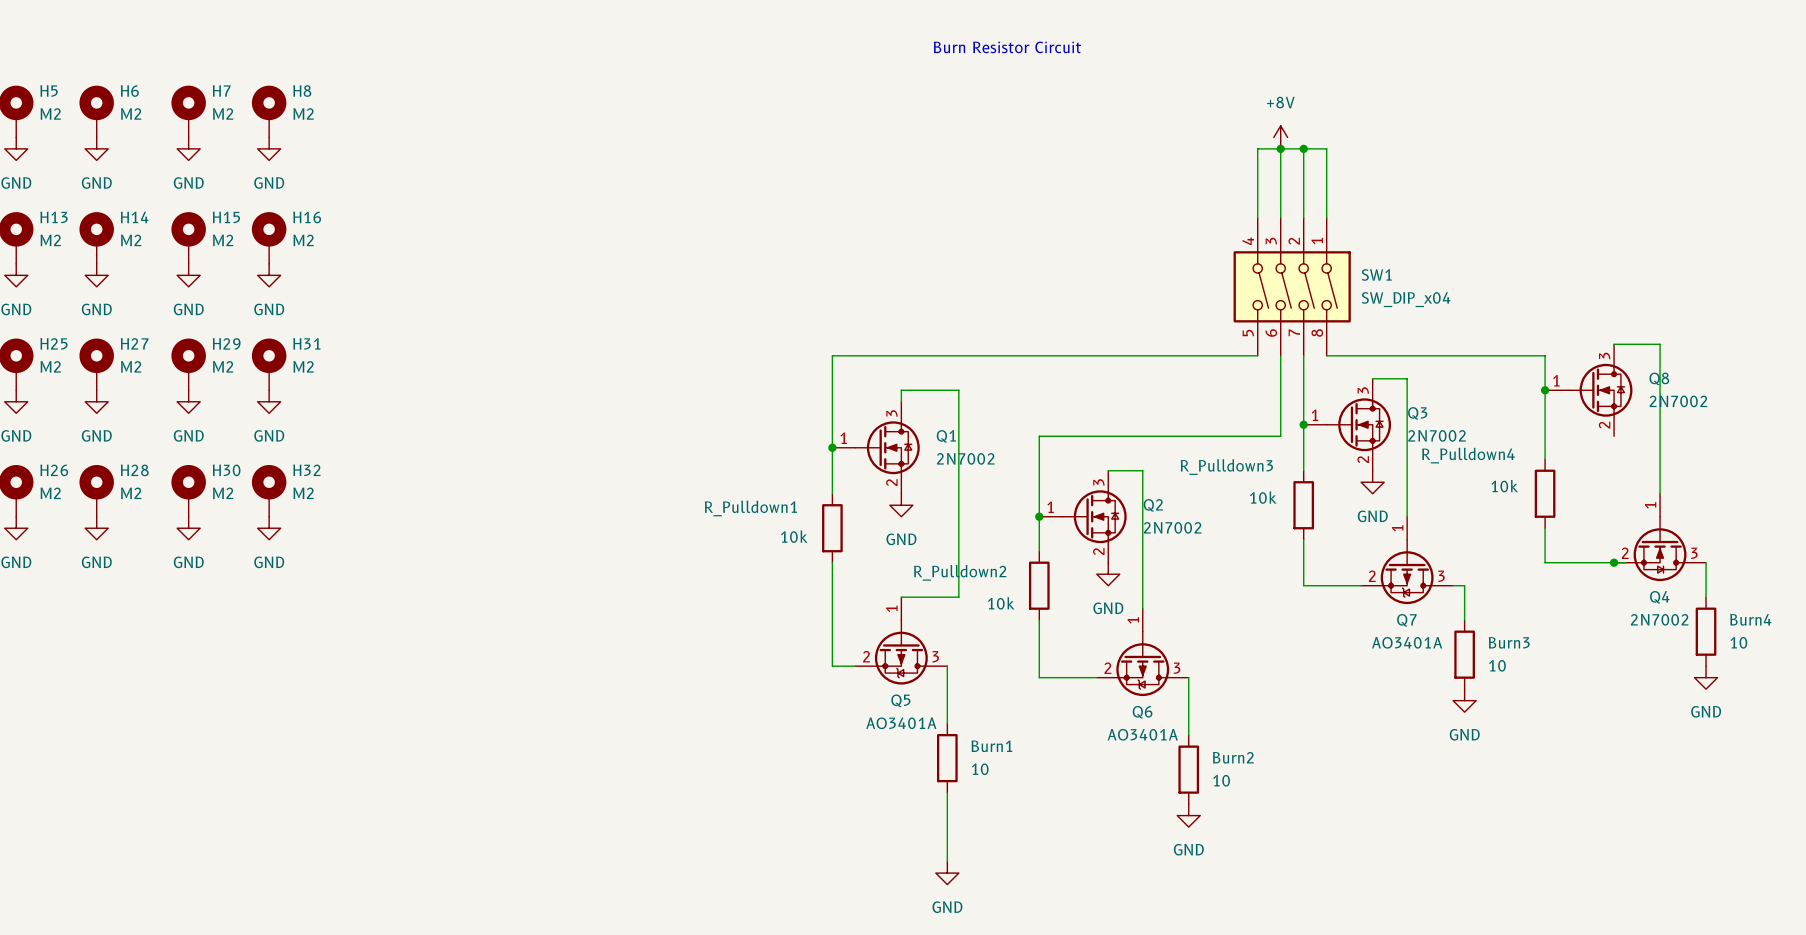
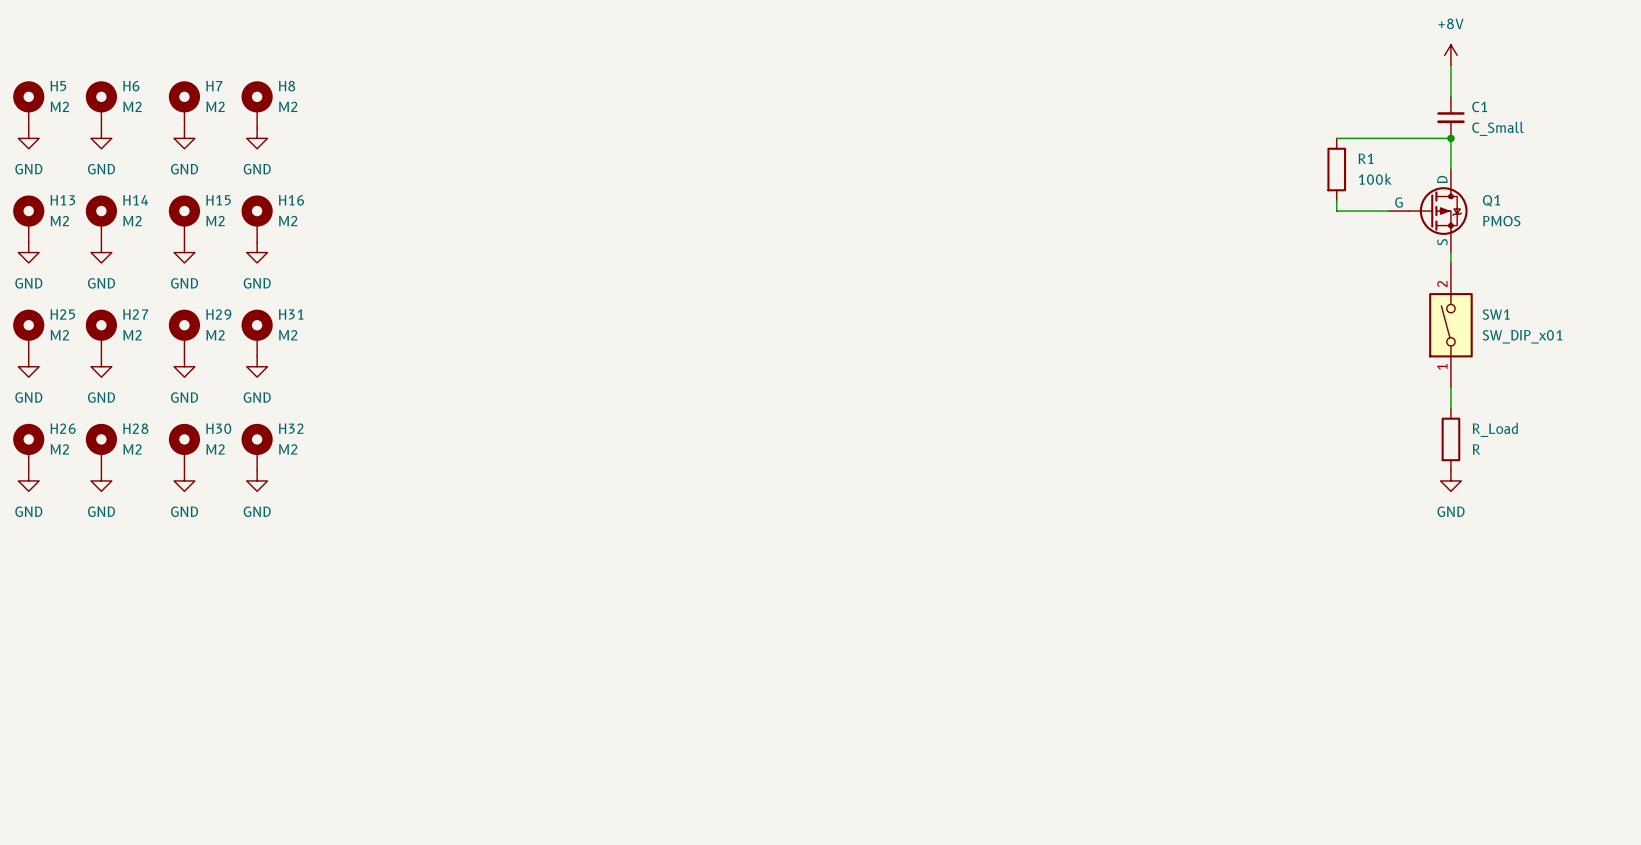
text: Burn Resistor Circuit (1007, 47) -> none
power symbol: none -> +8V (1450, 55)
wire: none -> (1450, 65) (1450, 96)
C1: none -> C_Small (1450, 117)
power symbol: +8V (1280, 137) -> none
wire: (1280, 148) (1280, 217) -> none
junction: (1280, 148) -> none
wire: (1303, 148) (1303, 217) -> none
junction: (1303, 148) -> none
wire: none -> (1336, 138) (1450, 138) (1450, 169)
junction: none -> (1450, 138)
R1: none -> 100k (1336, 169)
SW1 symbol: [1233, 217, 1351, 356] -> [1429, 262, 1473, 388]
wire: (1257, 217) (1257, 148) (1326, 148) (1326, 217) -> none
wire: none -> (1336, 200) (1336, 211) (1388, 211)
SW1 name position: SW1 (1376, 274) -> SW1 (1496, 314)
wire: none -> (1450, 252) (1450, 262)
SW1 value: SW_DIP_x04 (1406, 299) -> SW_DIP_x01 (1522, 336)
wire: (1614, 344) (1660, 344) (1660, 493) -> none
wire: (1257, 355) (832, 355) (832, 493) -> none
wire: (1280, 355) (1280, 436) (1039, 436) (1039, 551) -> none
wire: (1303, 355) (1303, 470) -> none
wire: (1326, 355) (1545, 355) (1545, 459) -> none
wire: (1372, 378) (1407, 378) (1407, 516) -> none
junction: (1545, 390) -> none
Q8: 2N7002 (1588, 390) -> none
Q1 symbol: [832, 401, 920, 494] -> [1388, 169, 1468, 253]
wire: (901, 401) (901, 390) (958, 390) (958, 597) (901, 597) -> none
junction: (1303, 424) -> none
Q3: 2N7002 (1347, 424) -> none
wire: none -> (1450, 387) (1450, 408)
junction: (832, 447) -> none
Q1 value: 2N7002 (965, 458) -> PMOS (1501, 221)
wire: (1108, 470) (1142, 470) (1142, 608) -> none
power symbol: GND (1372, 482) -> none
R_Load: none -> R (1450, 439)
R_Pulldown4: 10k (1545, 493) -> none
power symbol: GND (901, 505) -> none
R_Pulldown3: 10k (1303, 505) -> none
junction: (1039, 516) -> none
Q2: 2N7002 (1082, 516) -> none
R_Pulldown1: 10k (832, 528) -> none
wire: (1545, 528) (1545, 562) (1625, 562) -> none
power symbol: none -> GND (1450, 480)
Q4: 2N7002 (1660, 537) -> none
wire: (1303, 539) (1303, 585) (1361, 585) -> none
Q7: AO3401A (1407, 560) -> none
wire: (832, 562) (832, 666) (855, 666) -> none
junction: (1614, 562) -> none
wire: (1706, 562) (1706, 597) -> none
power symbol: GND (1108, 574) -> none
R_Pulldown2: 10k (1039, 585) -> none
wire: (1453, 585) (1464, 585) (1464, 620) -> none
wire: (1039, 620) (1039, 677) (1096, 677) -> none
Burn4: 10 (1706, 631) -> none
Q5: AO3401A (901, 640) -> none
Q6: AO3401A (1142, 652) -> none
Burn3: 10 (1464, 654) -> none
wire: (947, 666) (947, 723) -> none
wire: (1188, 677) (1188, 735) -> none
power symbol: GND (1706, 677) -> none
power symbol: GND (1464, 700) -> none
Burn1: 10 (947, 758) -> none
Burn2: 10 (1188, 769) -> none
wire: (947, 792) (947, 861) -> none
power symbol: GND (1188, 815) -> none
power symbol: GND (947, 873) -> none

